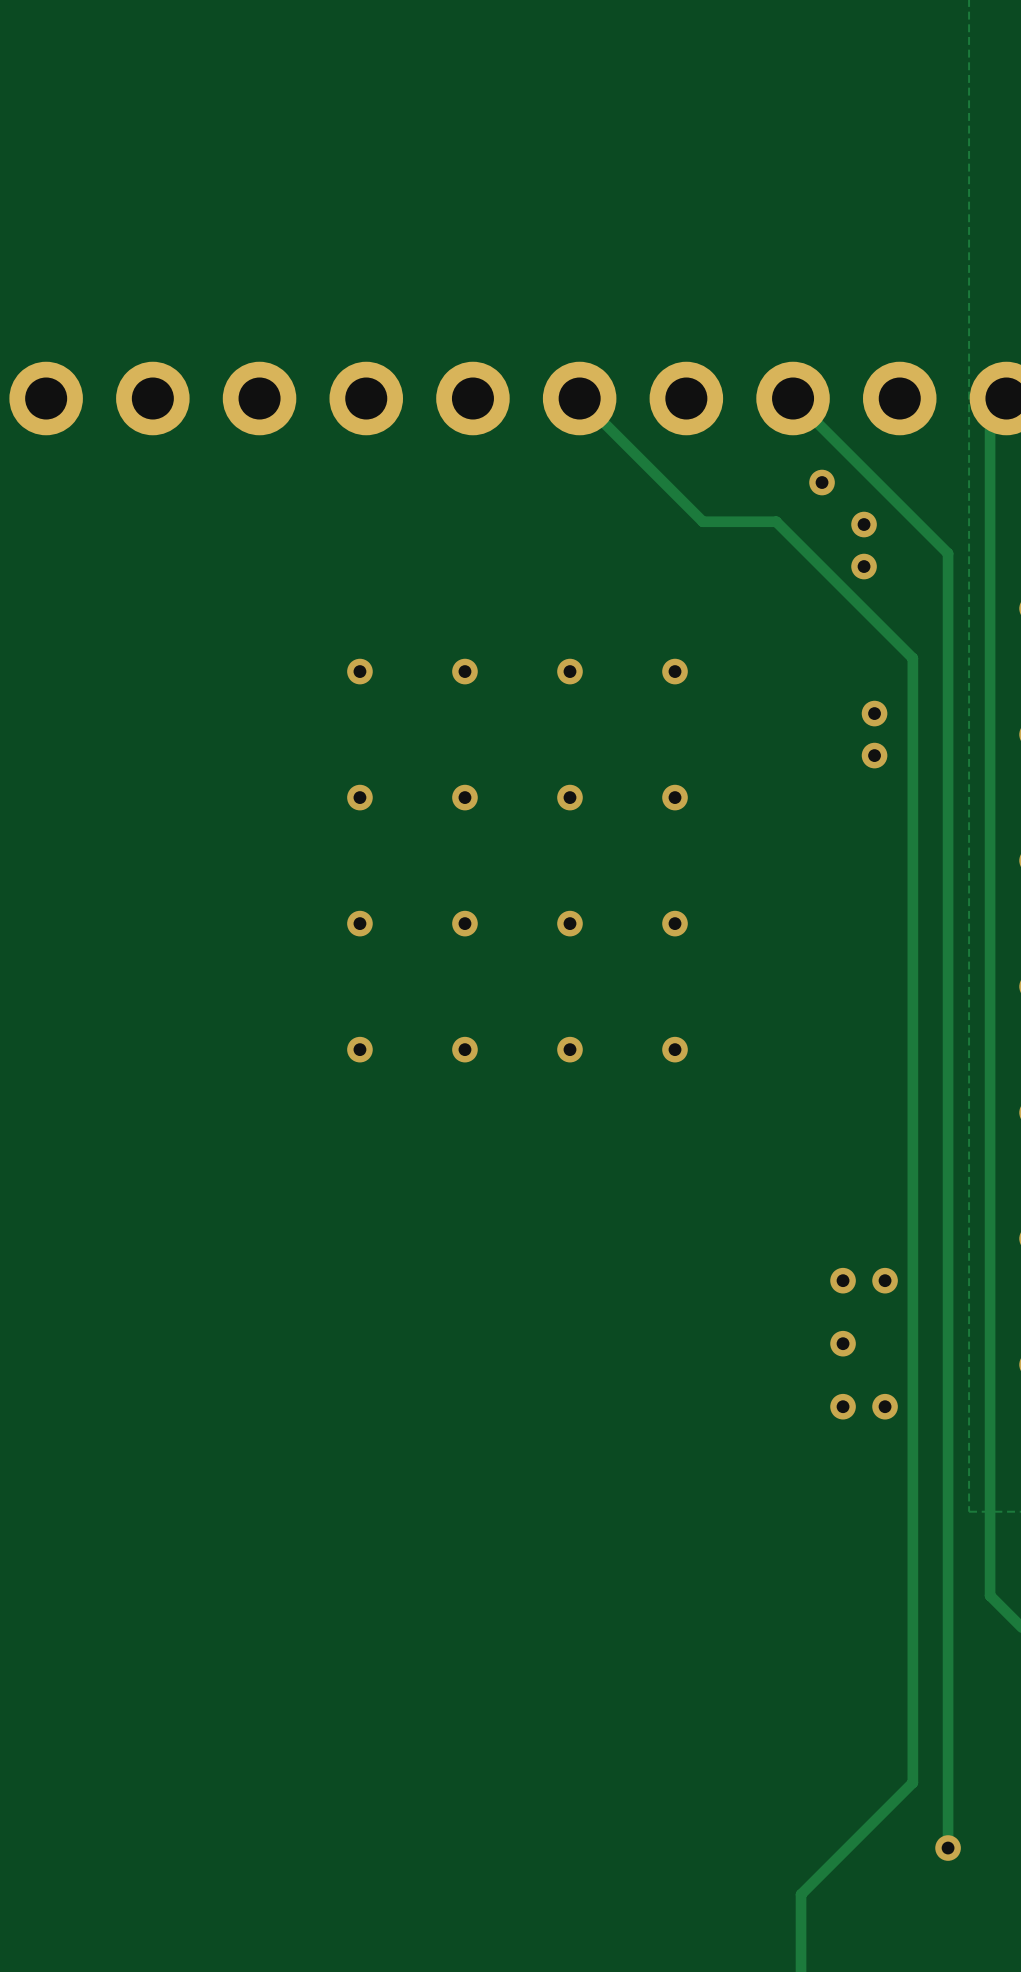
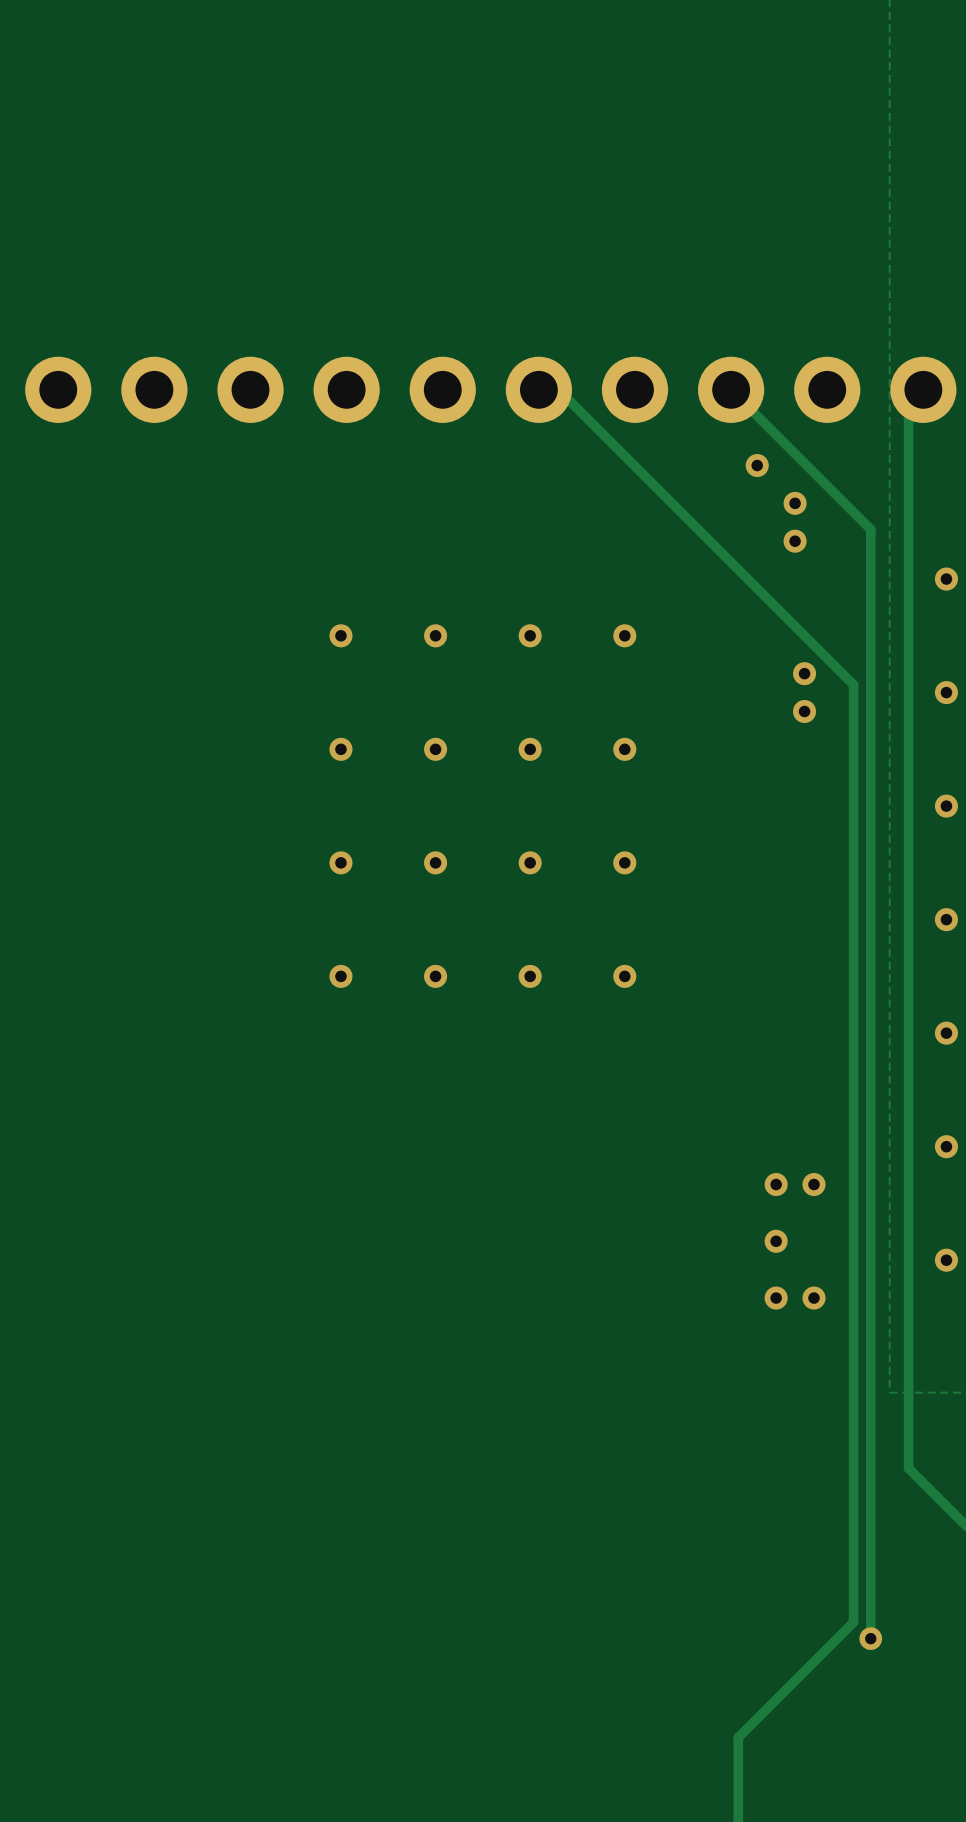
track: (579, 398) (702, 521) (776, 521) (912, 658) (912, 1782) -> (538, 389) (558, 389) (853, 684) (853, 1622) (839, 1636)
track: (948, 1784) (948, 1848) -> none
via position: (948, 1848) -> (870, 1638)

